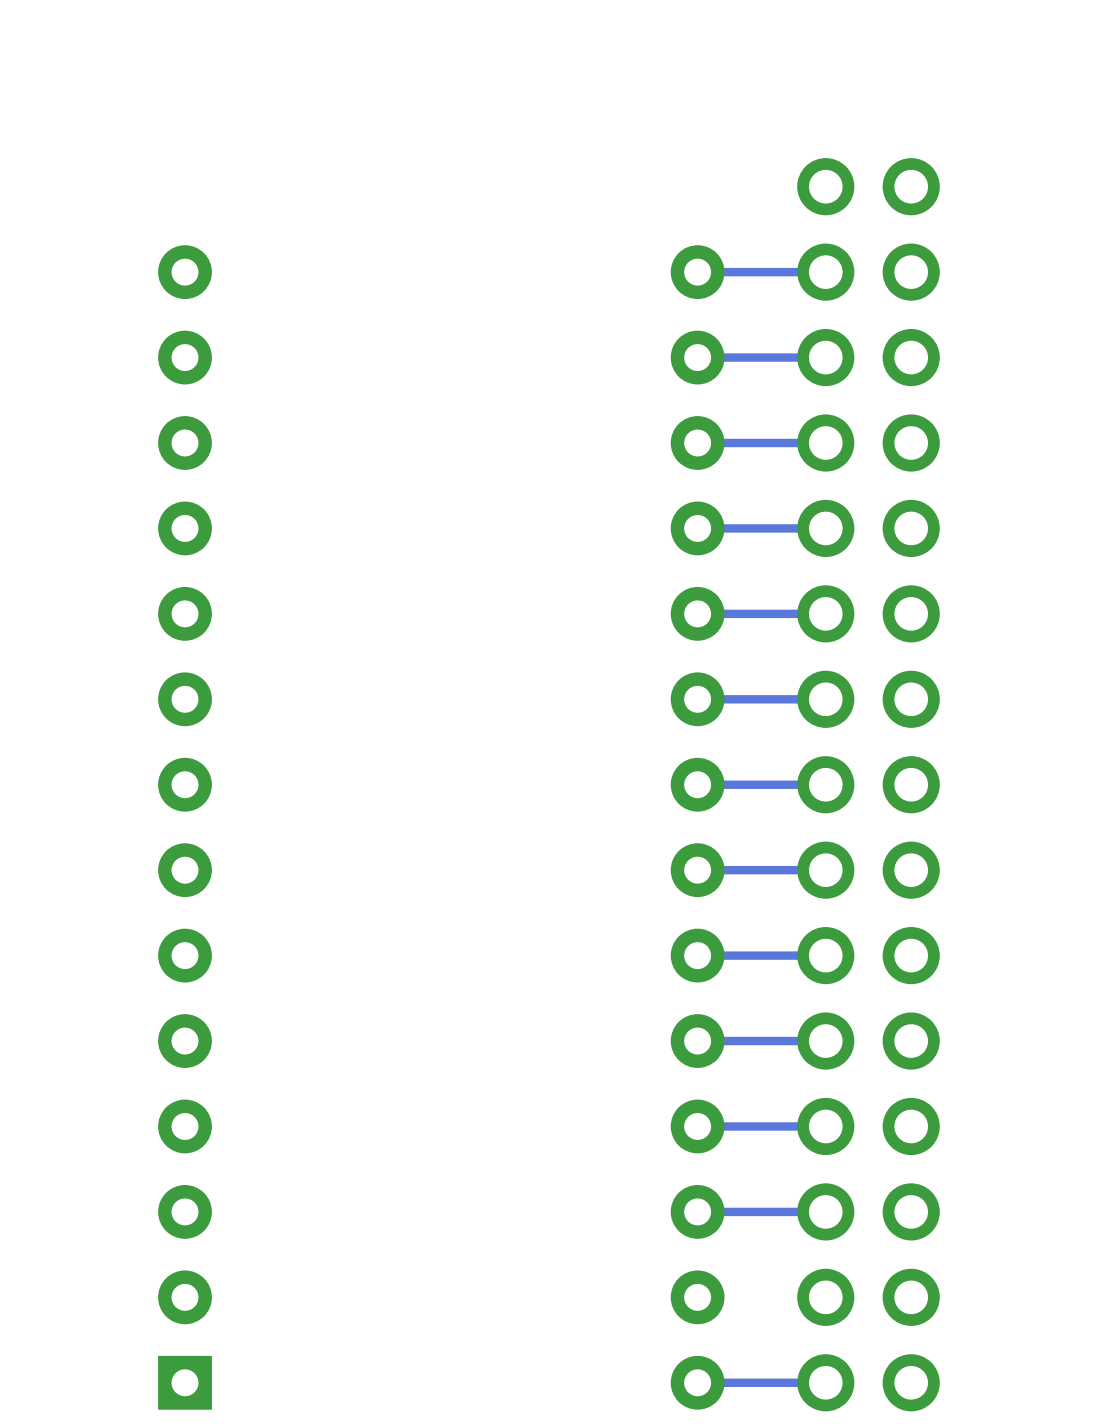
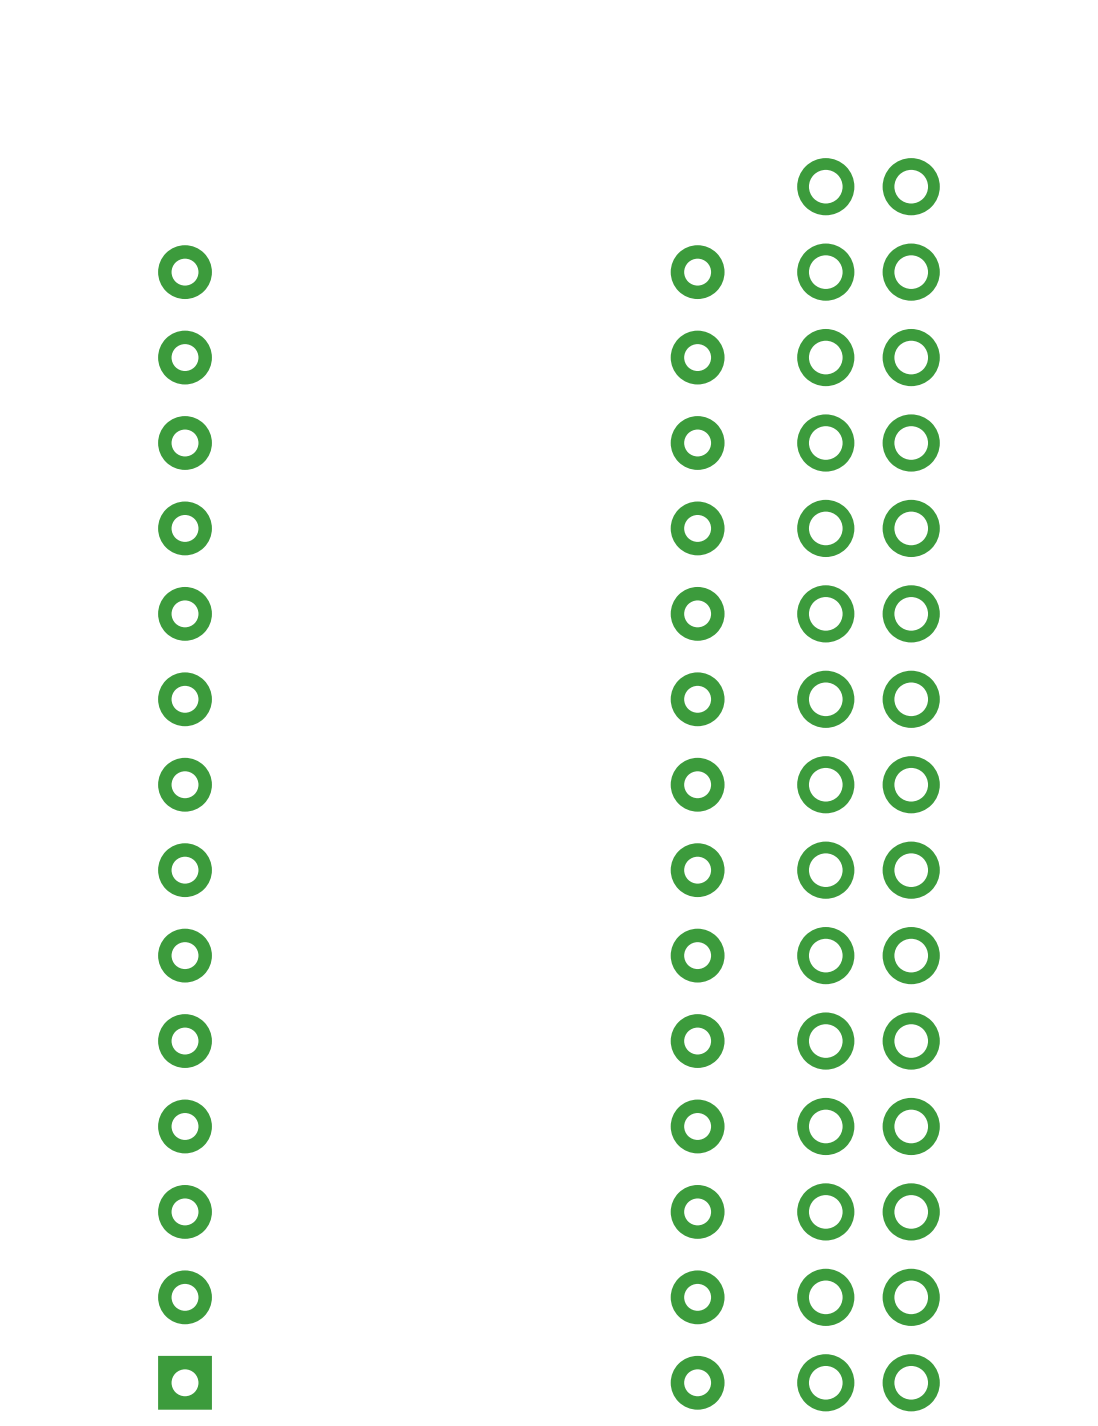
track: (825, 272) (697, 272) -> none
track: (825, 357) (697, 357) -> none
track: (825, 443) (697, 443) -> none
track: (825, 528) (697, 528) -> none
track: (825, 613) (697, 613) -> none
track: (825, 699) (697, 699) -> none
track: (825, 784) (697, 784) -> none
track: (825, 870) (697, 870) -> none
track: (825, 955) (697, 955) -> none
track: (825, 1041) (697, 1041) -> none
track: (825, 1126) (697, 1126) -> none
track: (825, 1211) (697, 1211) -> none
track: (825, 1382) (697, 1382) -> none

